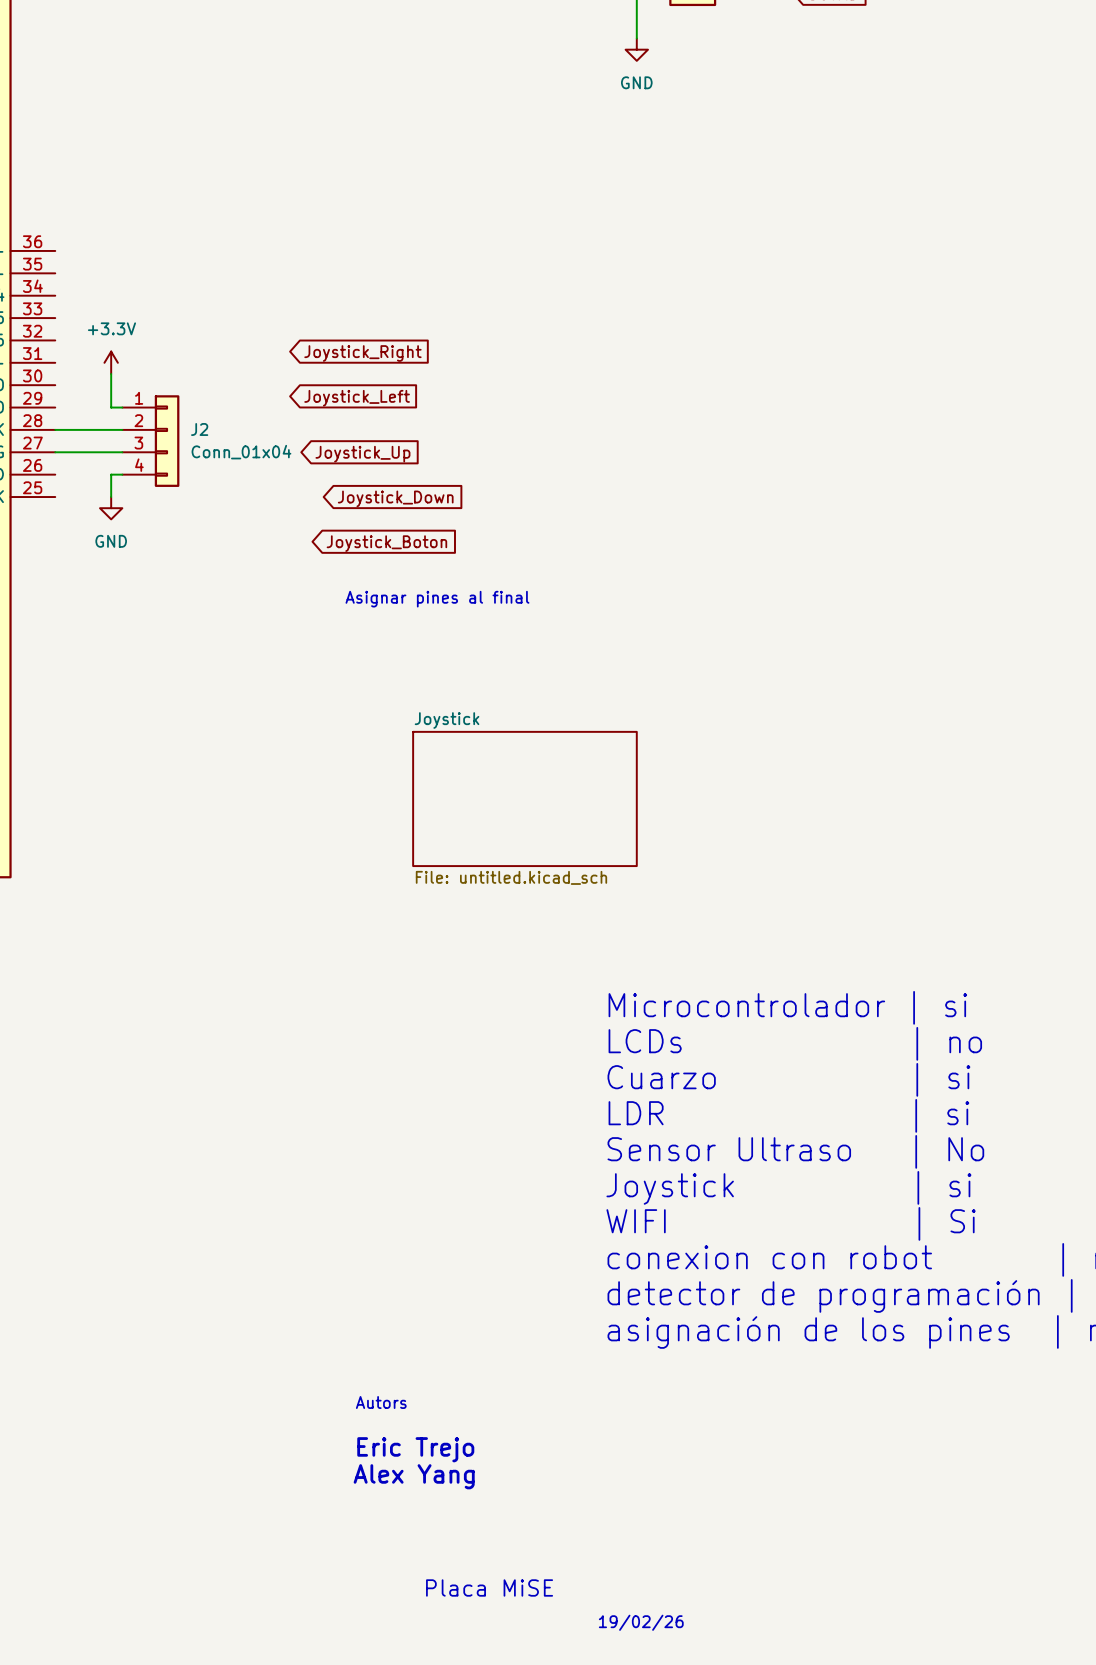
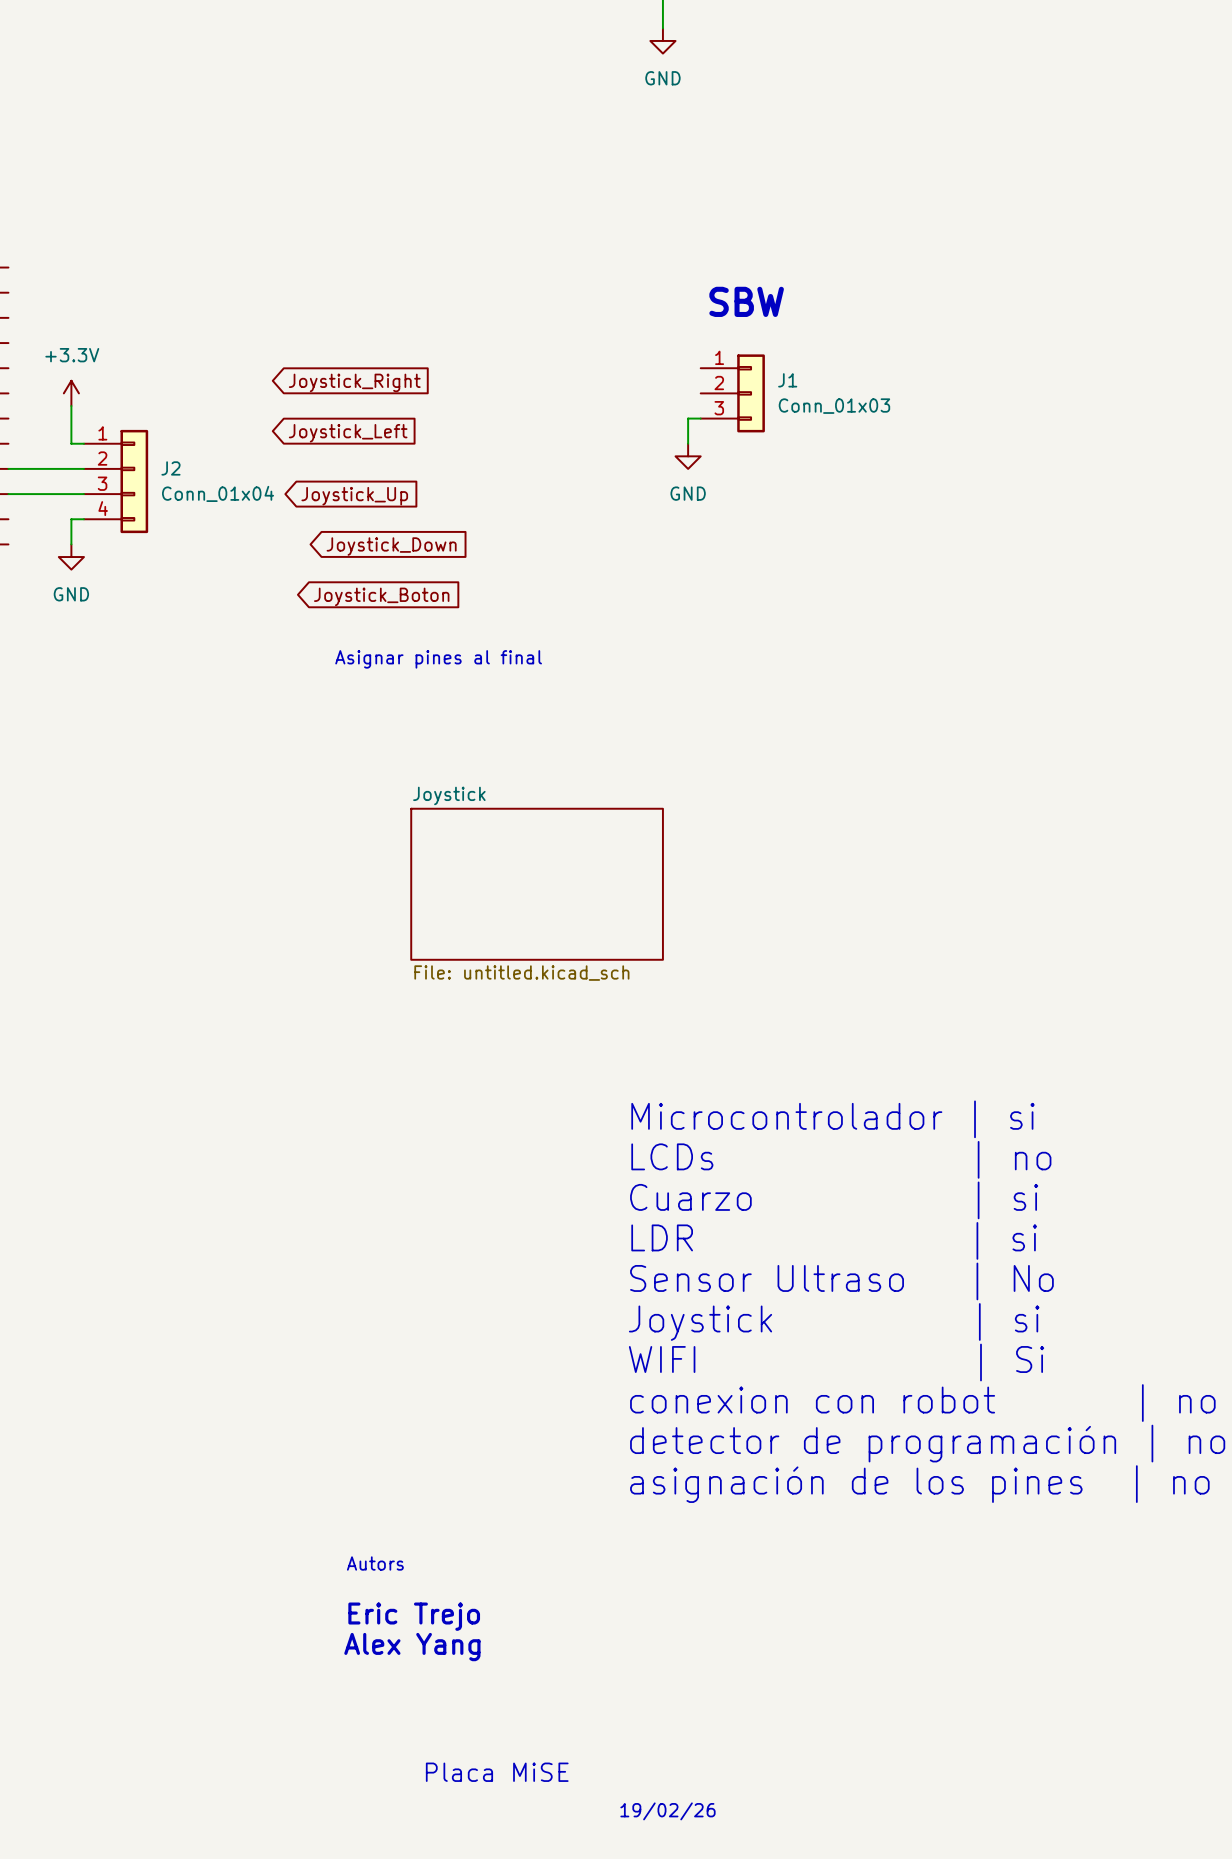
text: none -> SBW (746, 301)
J1: none -> Conn_01x03 (732, 393)
wire: none -> (700, 418) (688, 418) (688, 443)
power symbol: none -> GND (688, 456)

